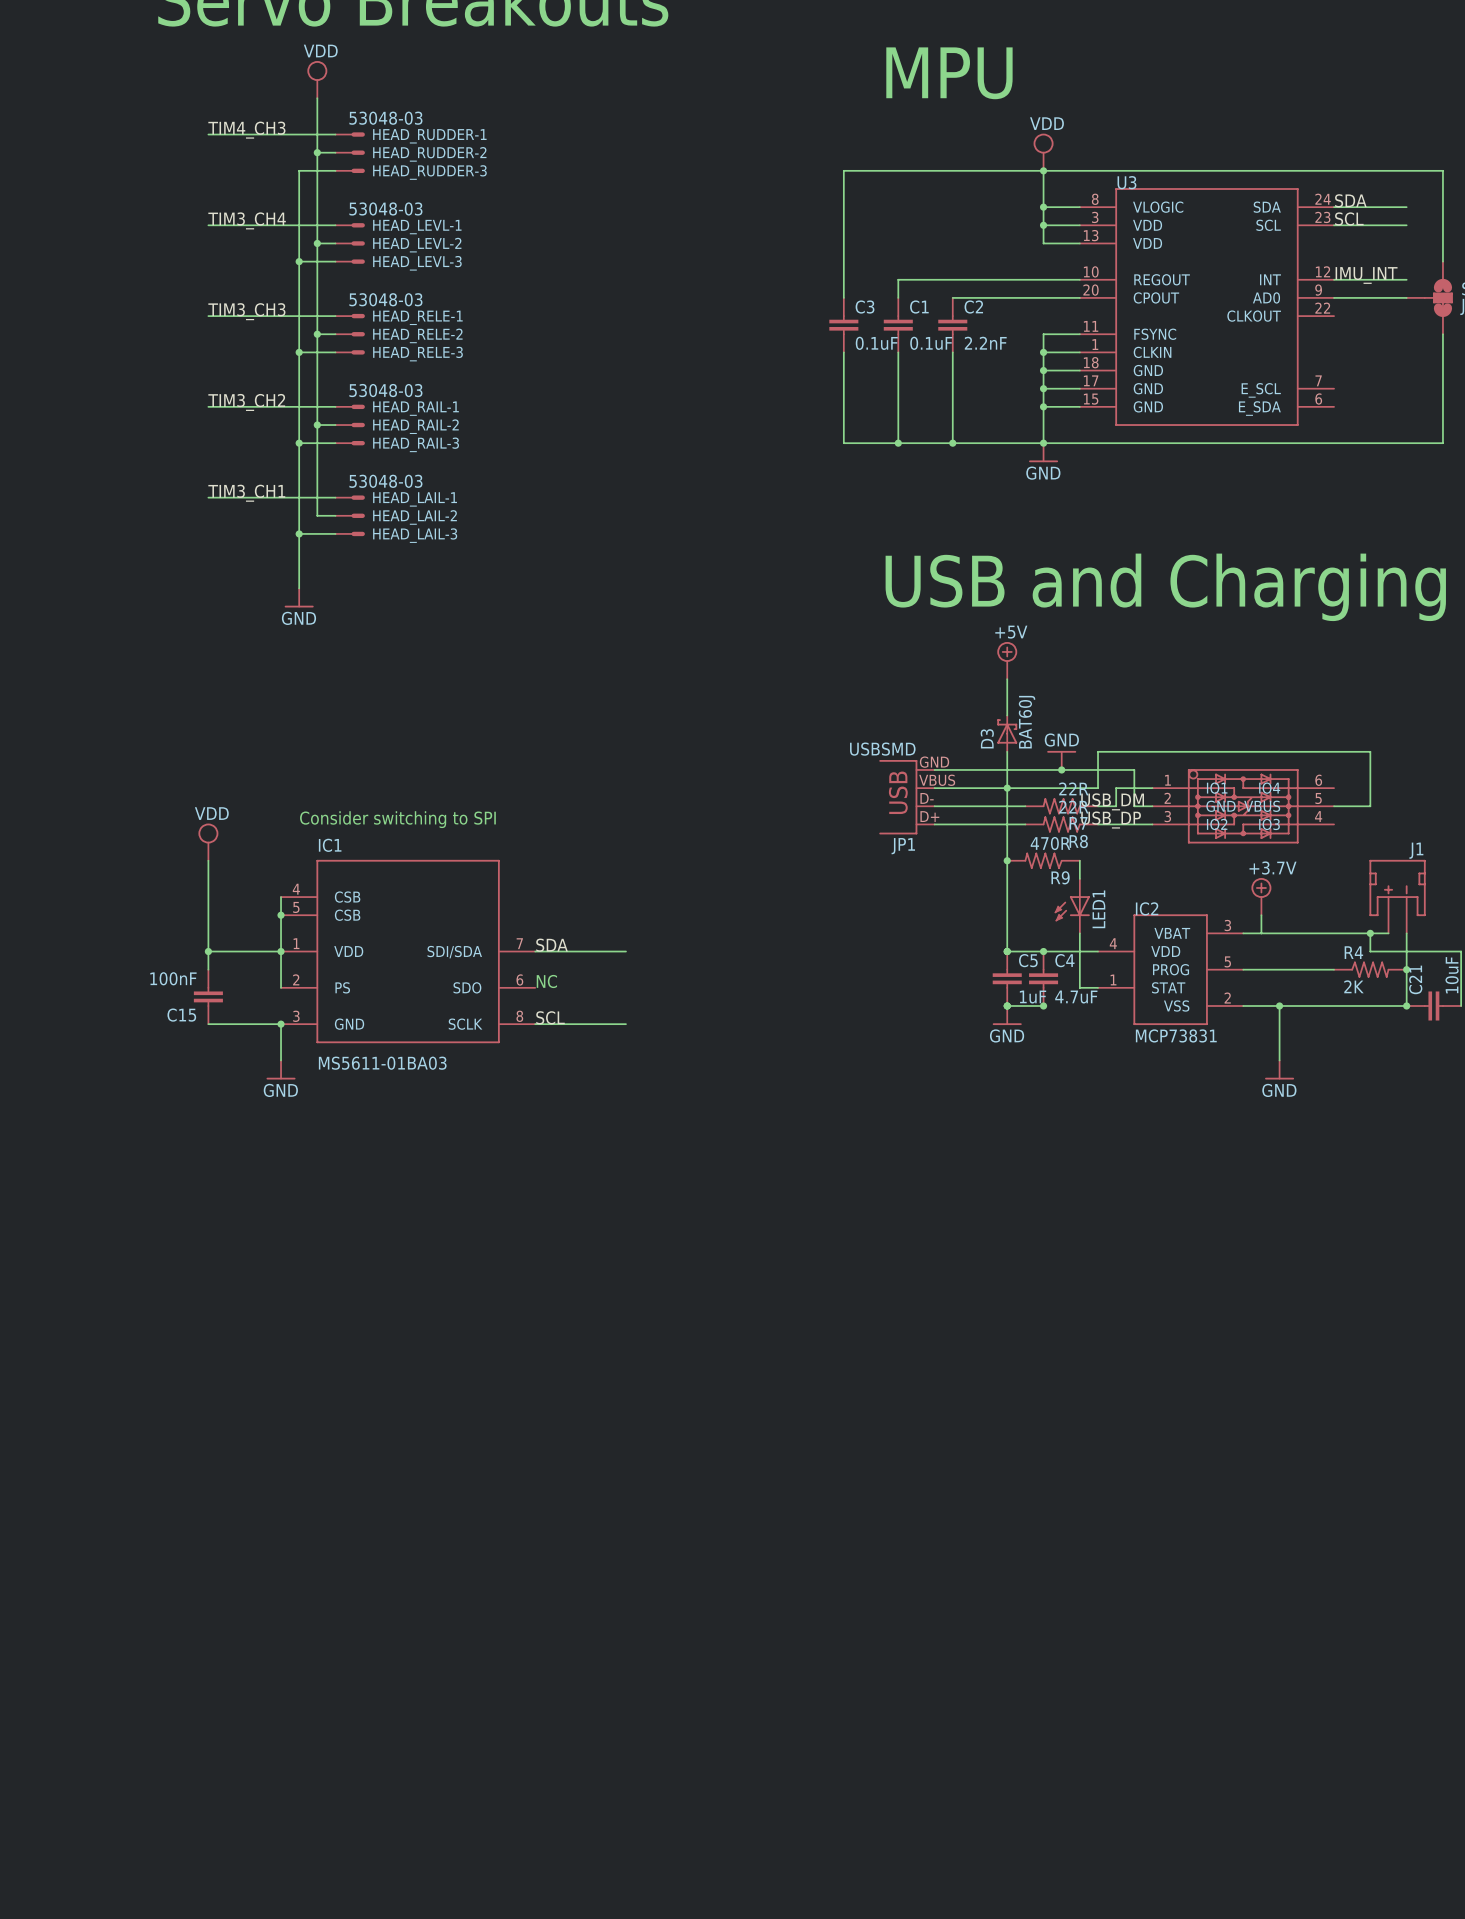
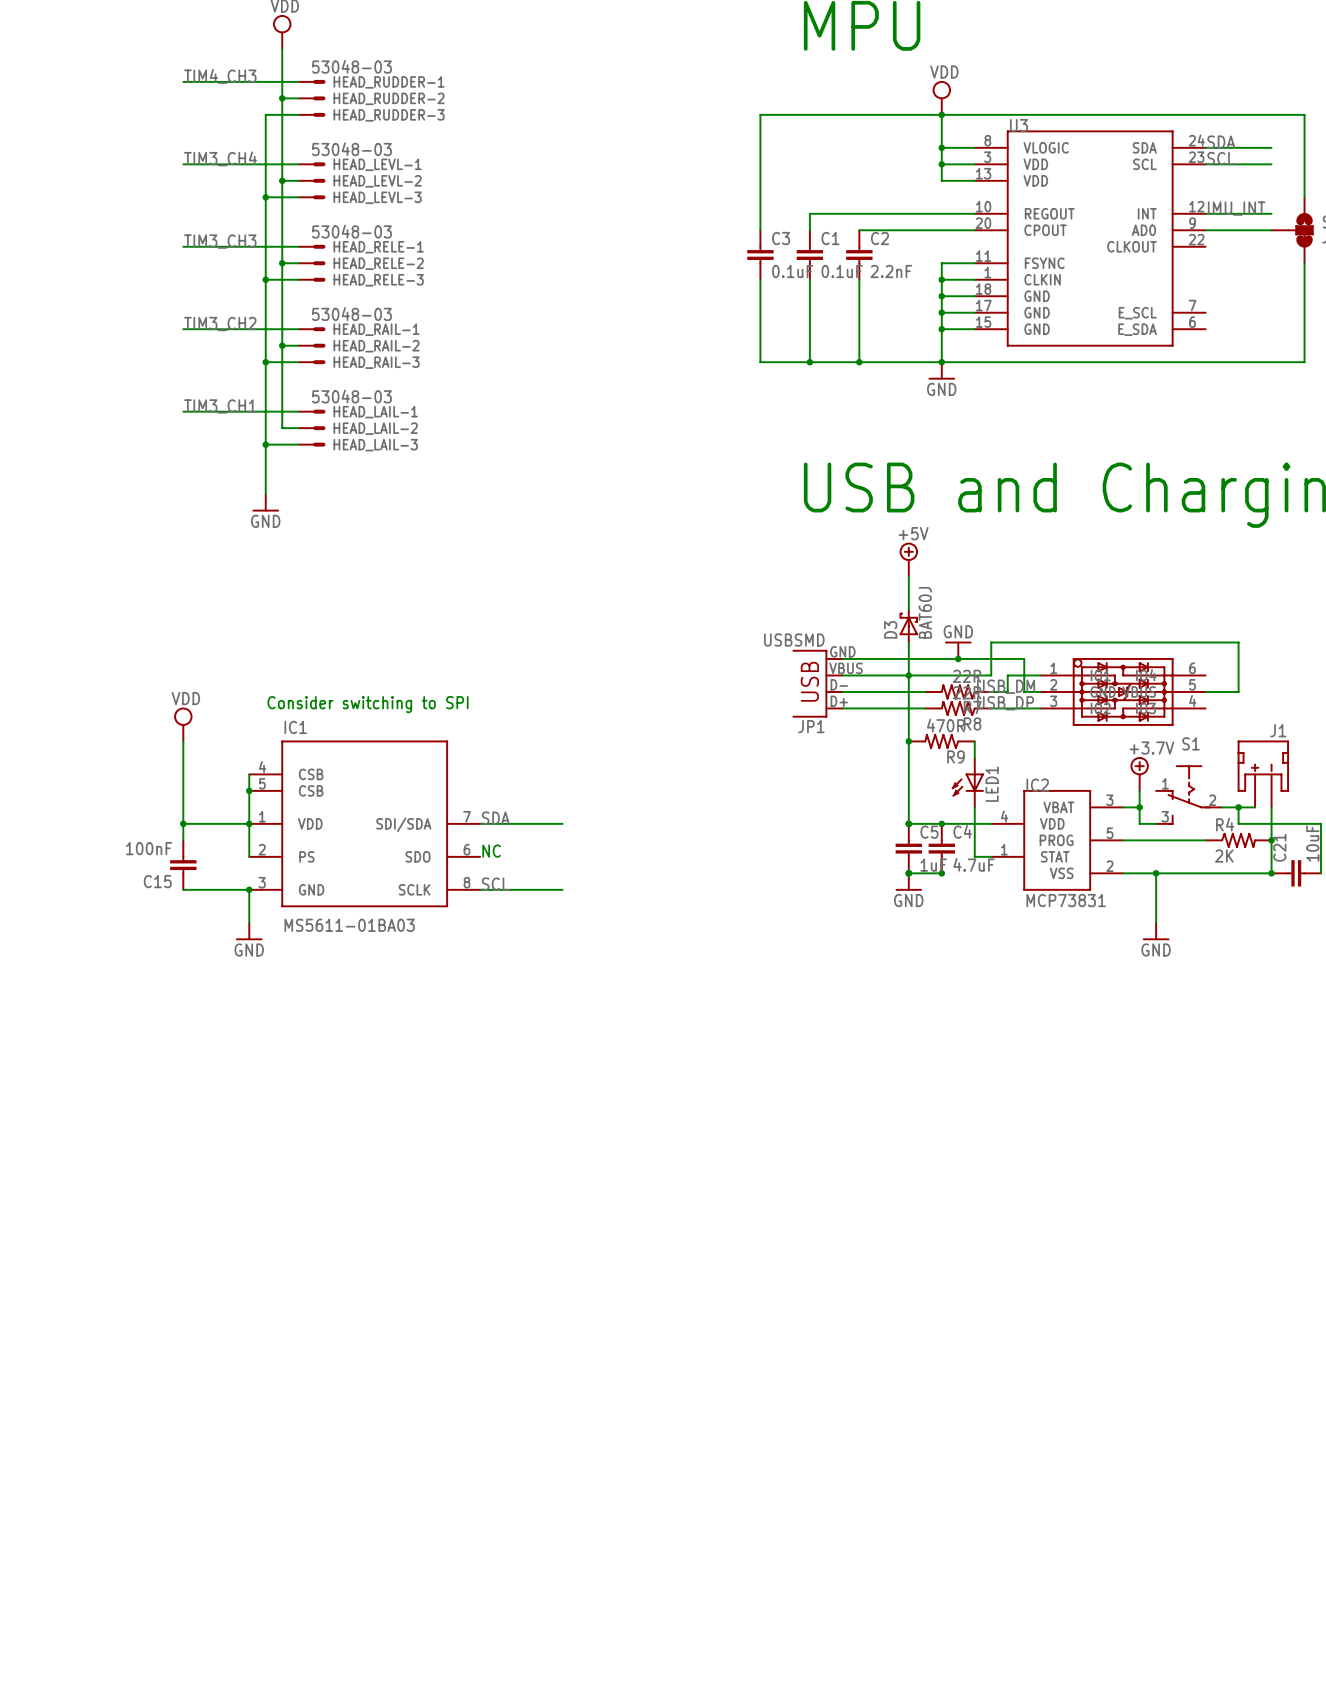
S1: none -> (1189, 795)
wire: (1261, 933) (1352, 933) -> (1139, 807) (1139, 823) (1156, 823)
junction: none -> (1139, 807)

